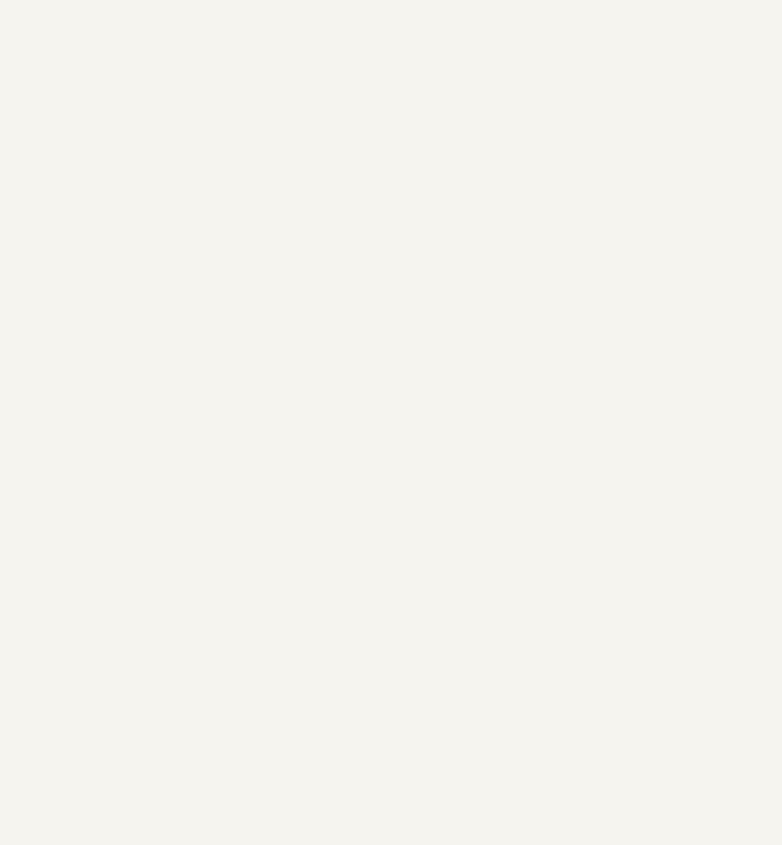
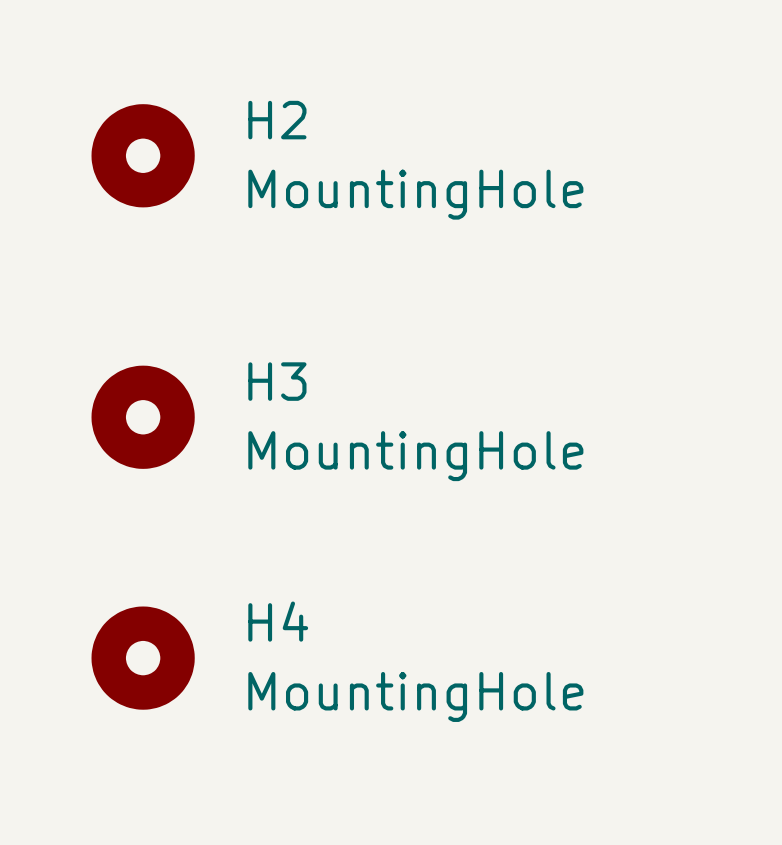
H2: none -> MountingHole (143, 155)
H3: none -> MountingHole (143, 417)
H4: none -> MountingHole (143, 658)

